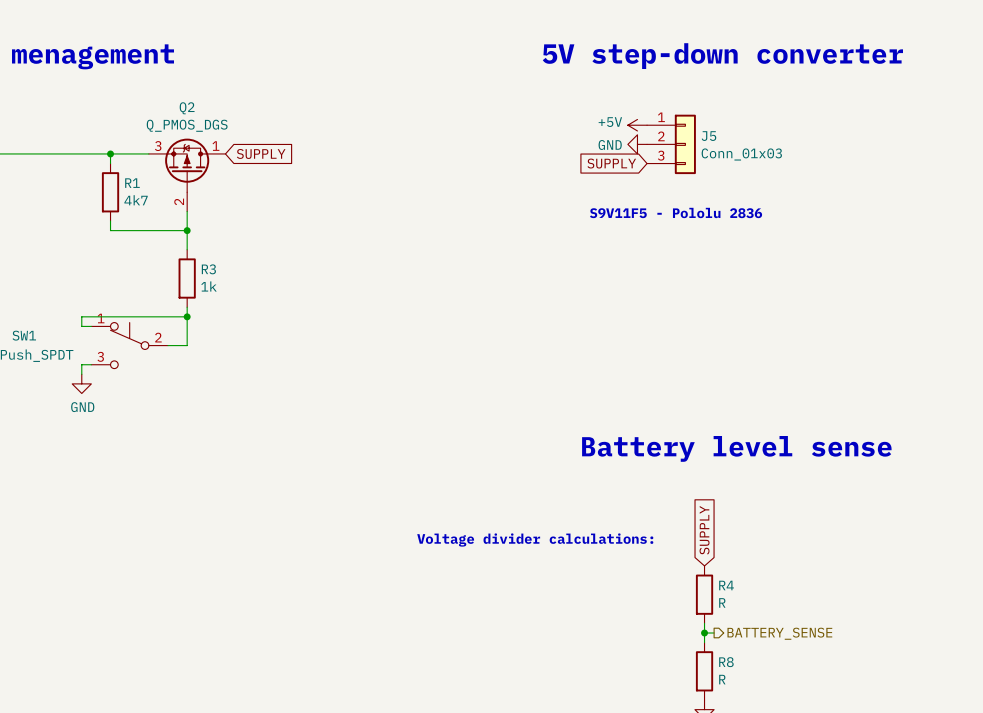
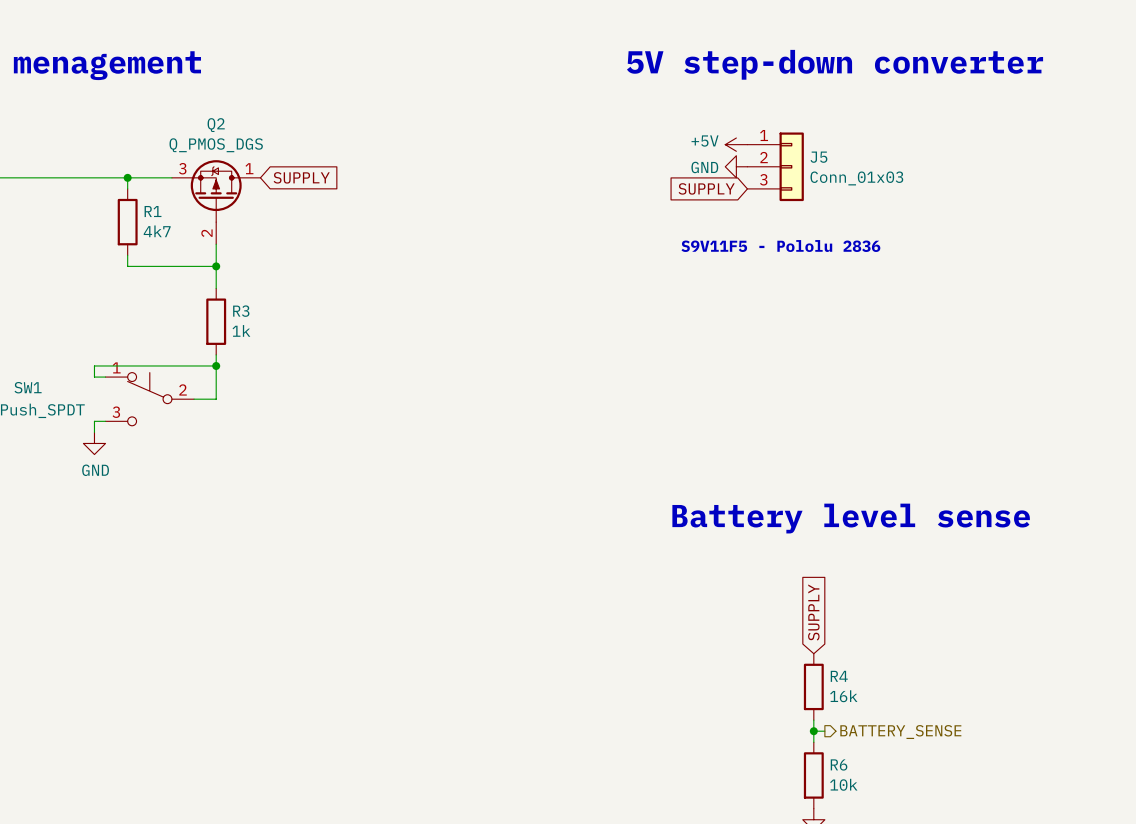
text: Voltage divider calculations: (535, 540) -> none
R4 value: R (722, 602) -> 16k (843, 696)
R8 name: R8 (726, 662) -> R6 (839, 764)
R8 value: R (722, 679) -> 10k (843, 784)

